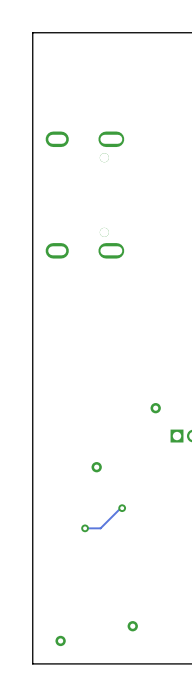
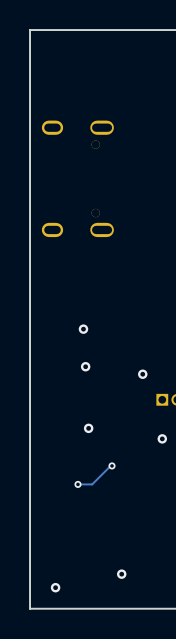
via: none -> (83, 329)
via: none -> (85, 366)
via: none -> (162, 438)

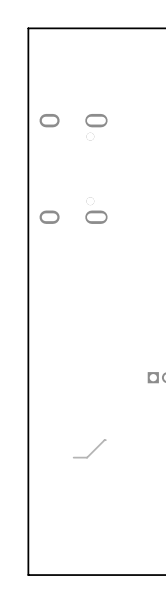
via: (83, 329) -> none
via: (85, 366) -> none
via: (142, 374) -> none
via: (88, 428) -> none
via: (162, 438) -> none
via: (112, 465) -> none
via: (77, 484) -> none
via: (121, 574) -> none
via: (55, 587) -> none

